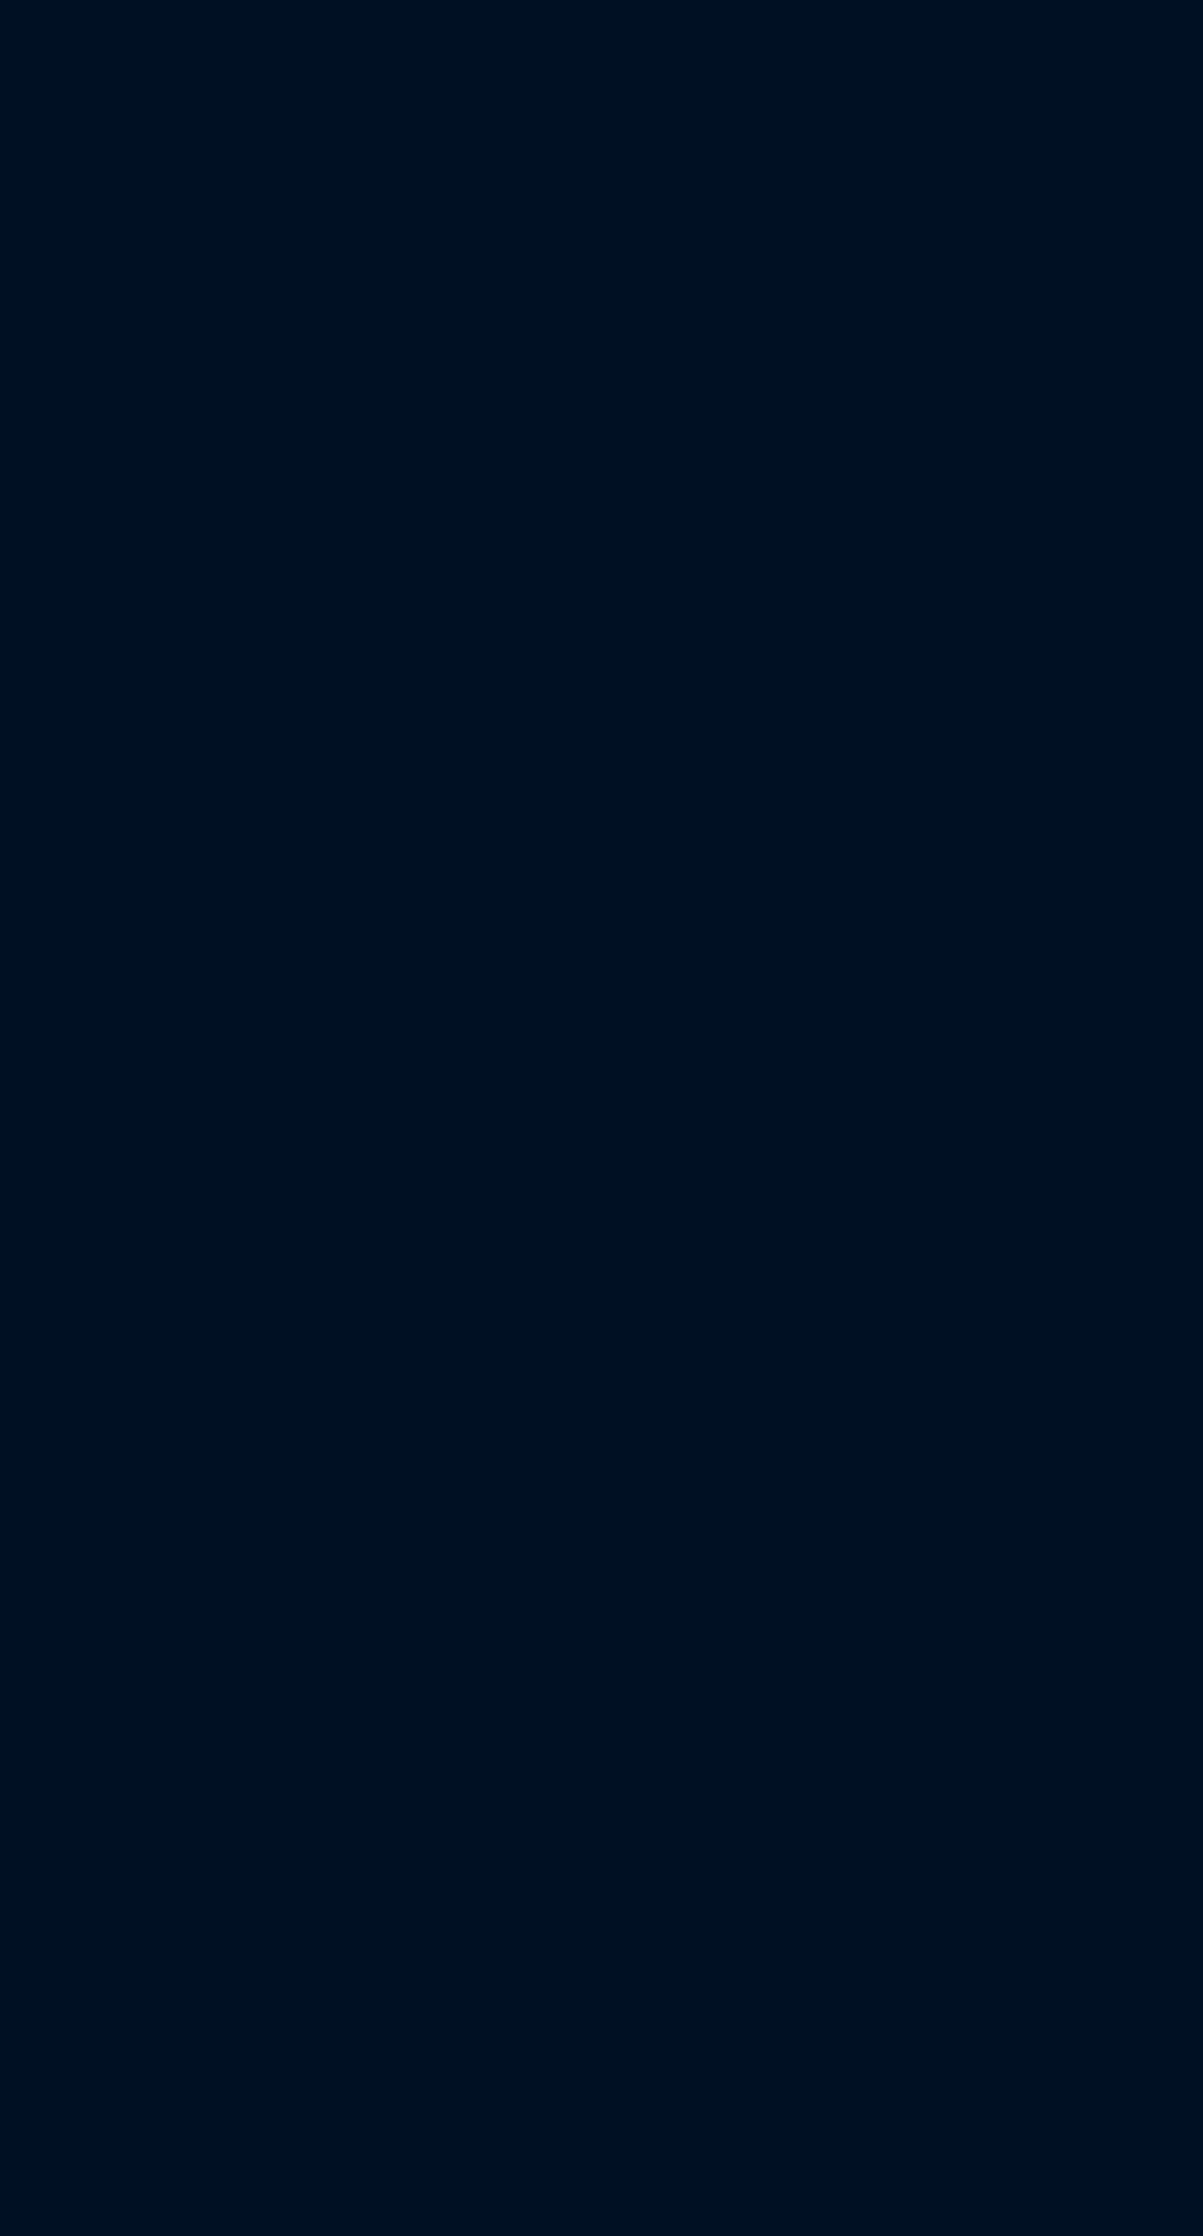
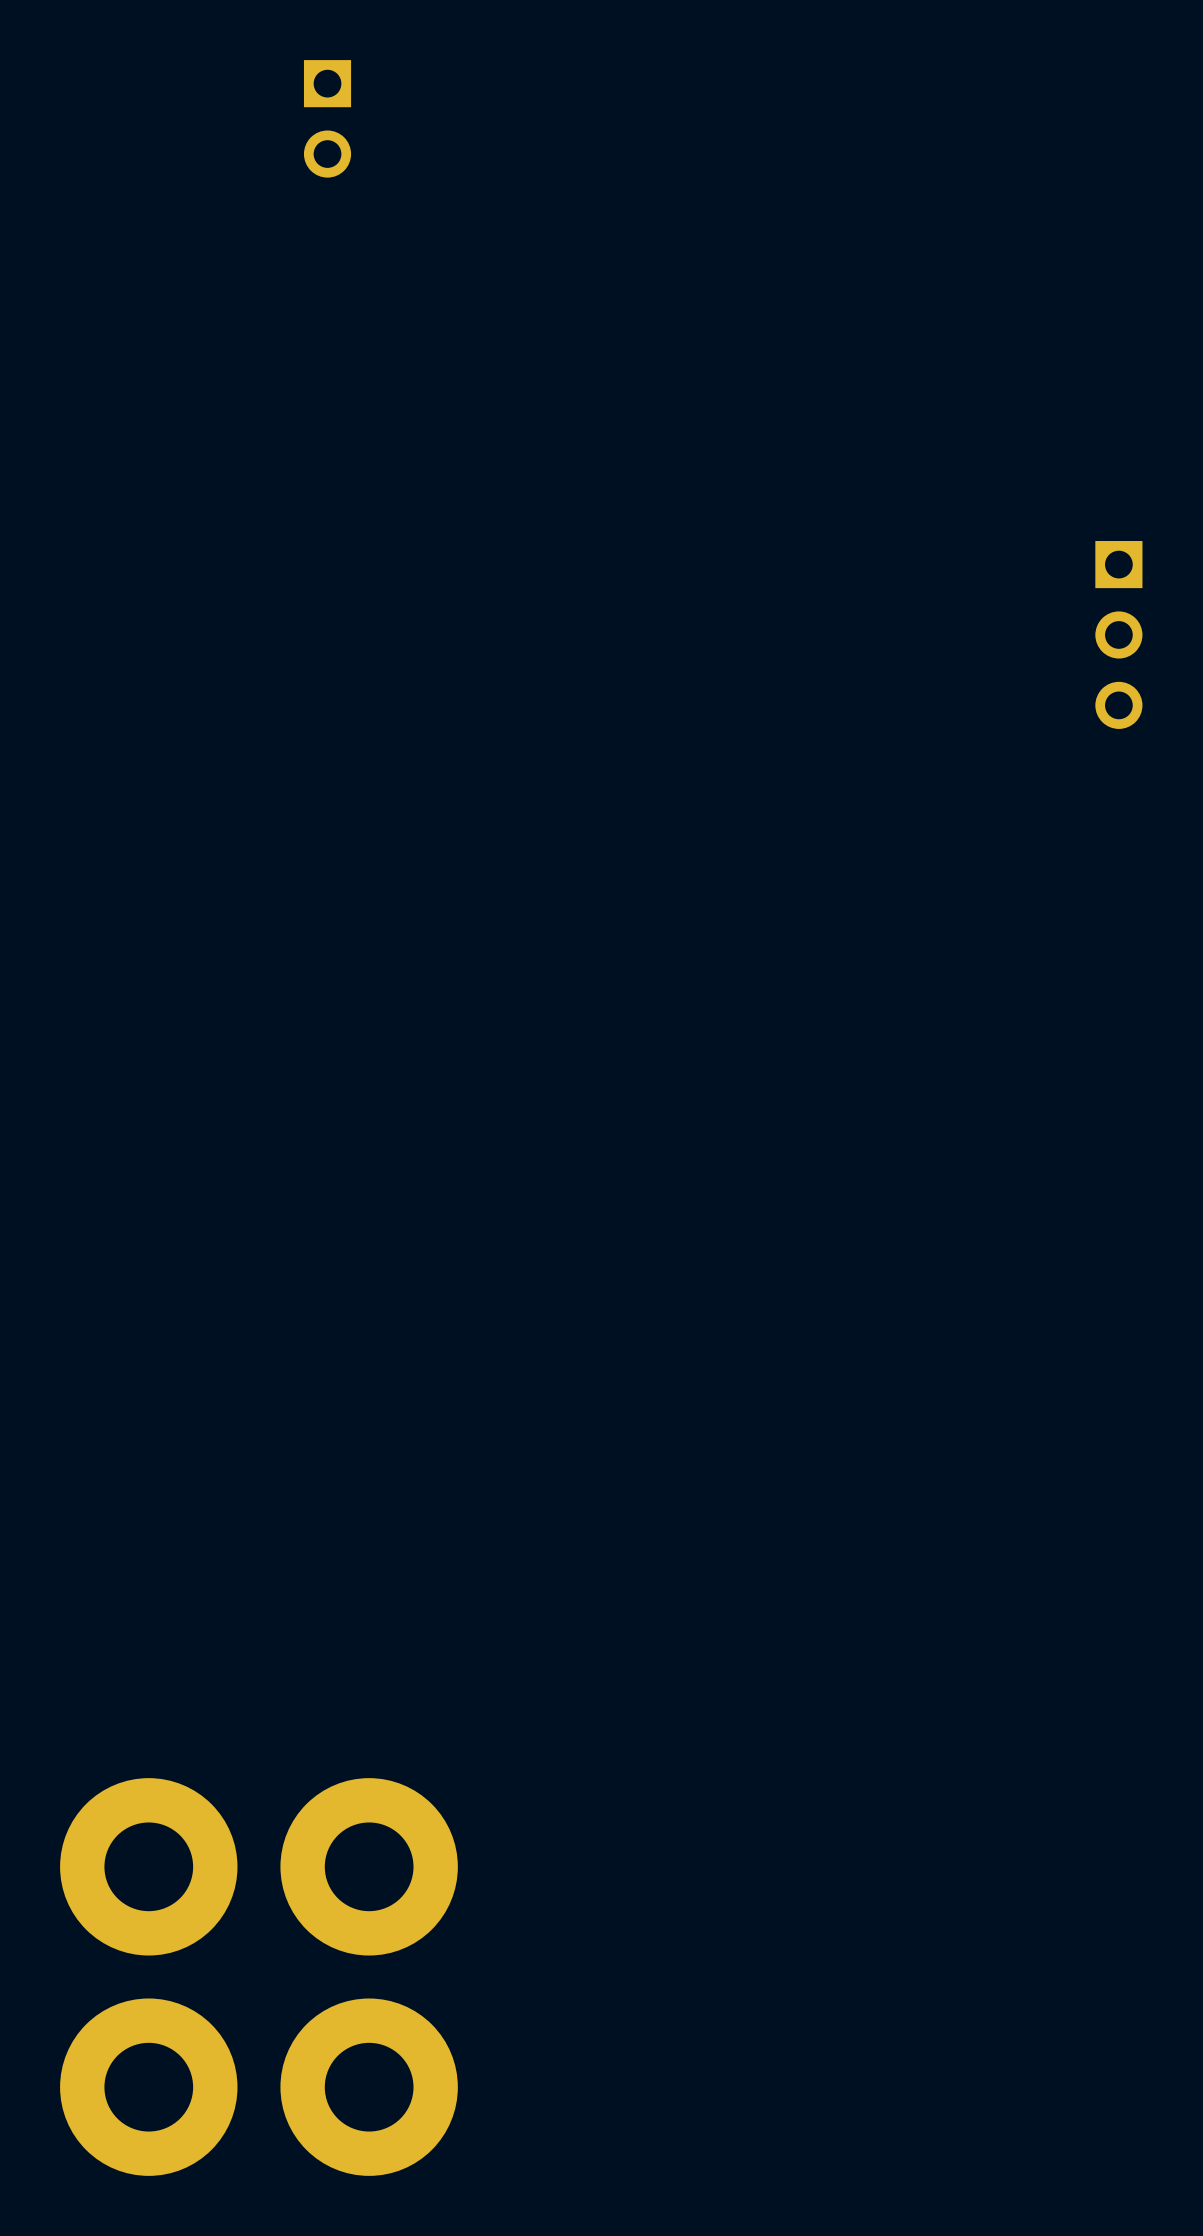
part: none -> (327, 118)
part: none -> (1118, 634)
part: none -> (148, 1866)
part: none -> (369, 1866)
part: none -> (148, 2087)
part: none -> (369, 2087)

